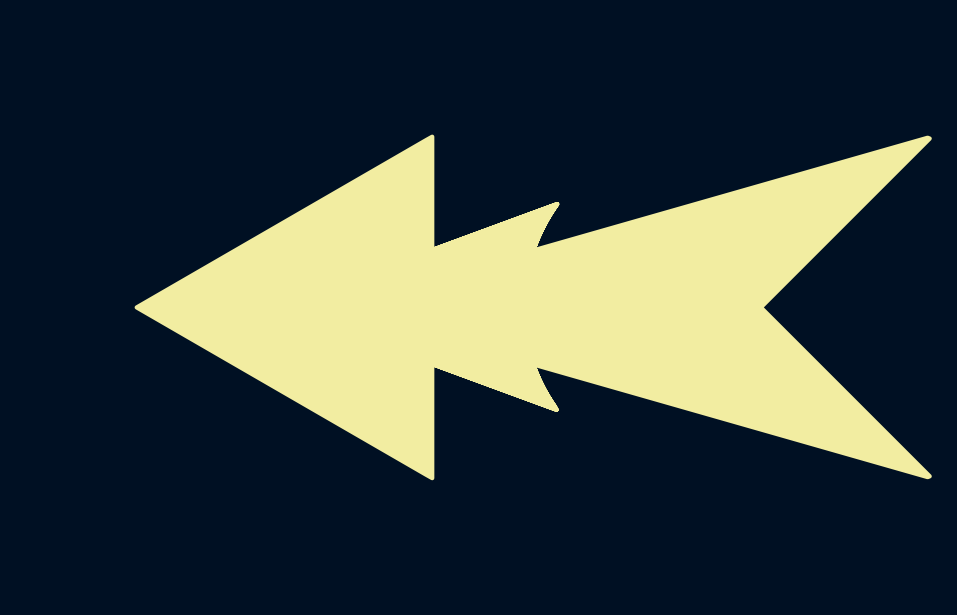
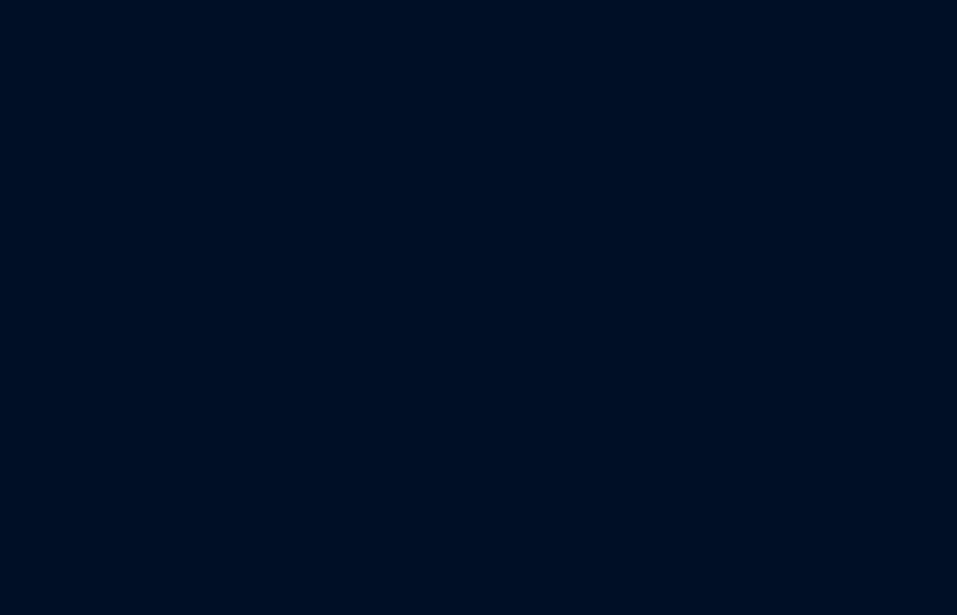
drawing: [134, 134, 932, 481] -> none

